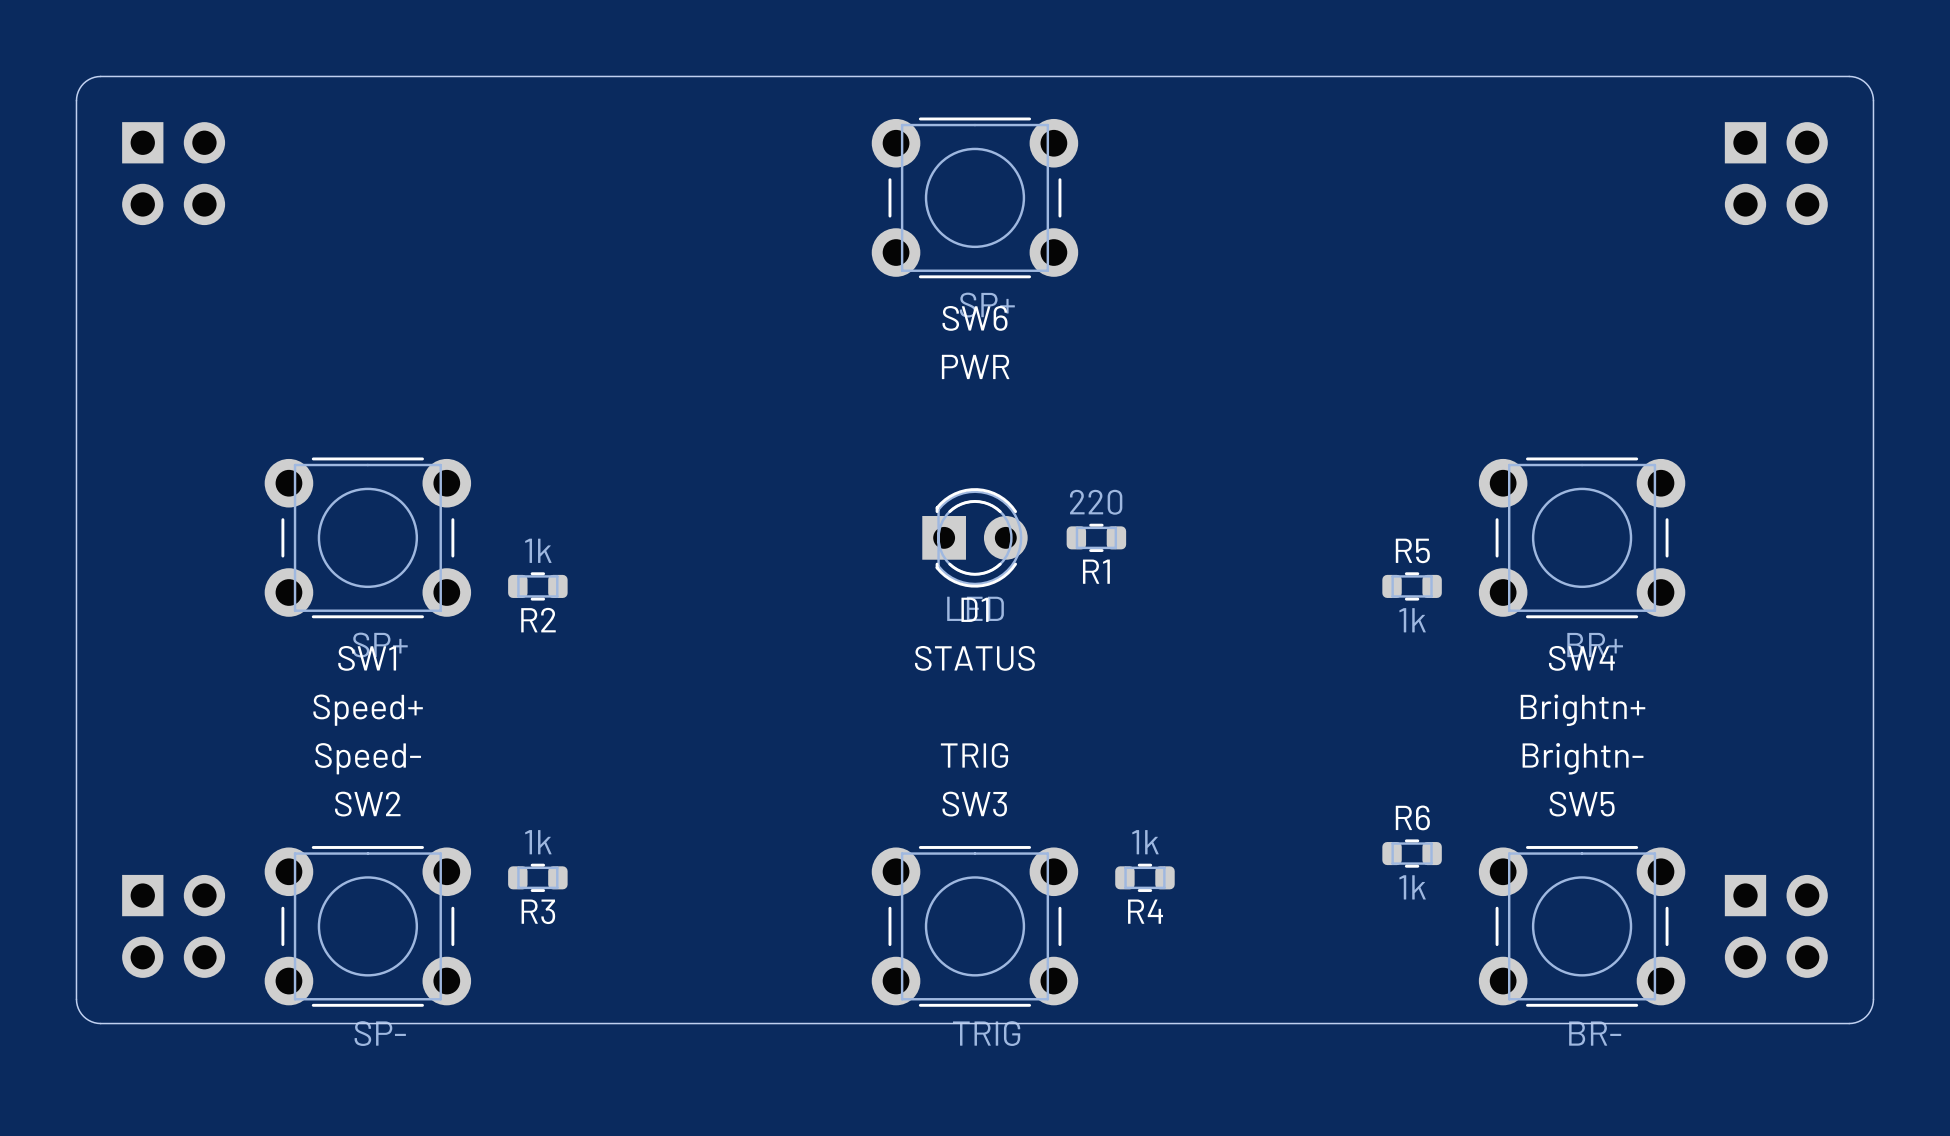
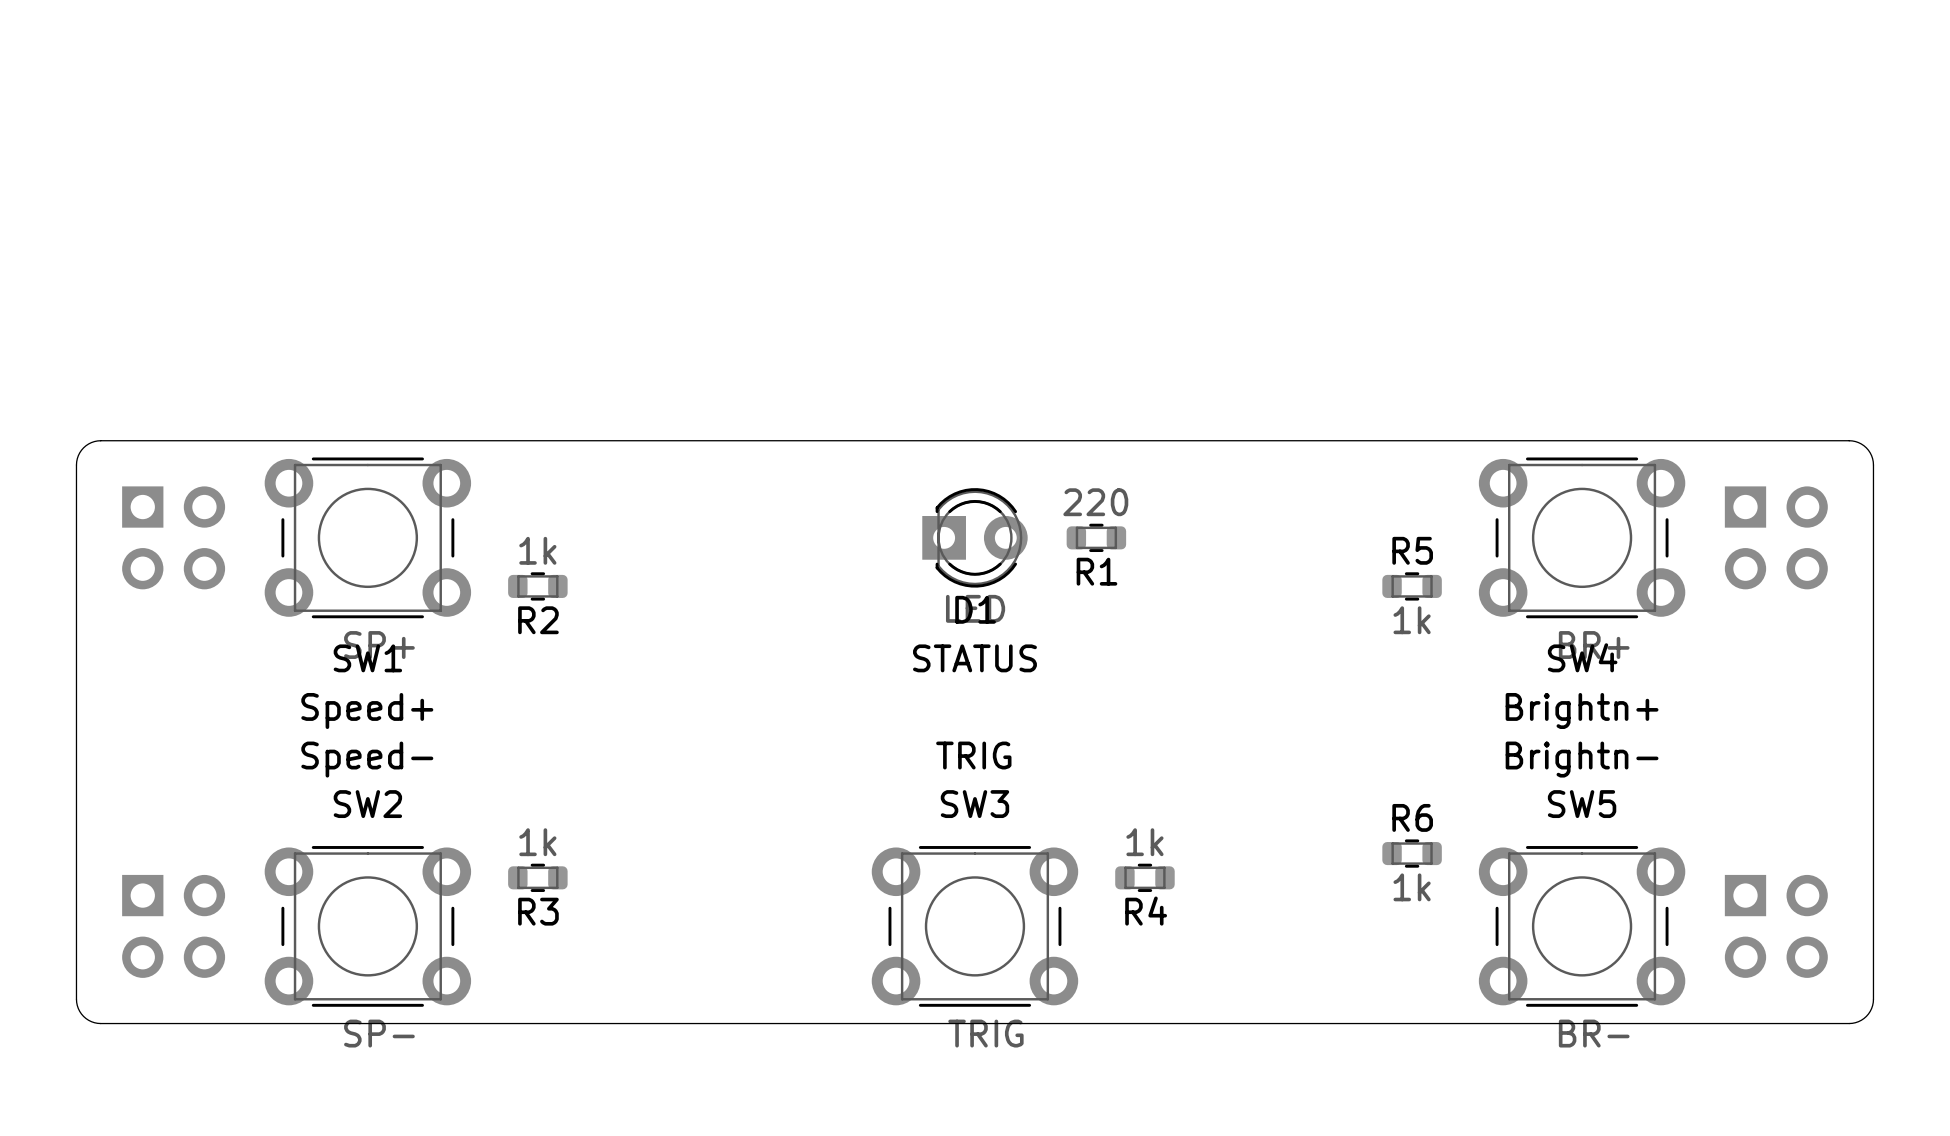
part position: (173, 173) -> (173, 537)
part position: (1776, 173) -> (1776, 537)
SW6: SP+ (974, 197) -> none
text: PWR (975, 366) -> none
board edge: (76, 465) (76, 100) (78, 91) (83, 83) (91, 78) (100, 76) (1855, 77) (1868, 85) (1873, 100) (1873, 465) -> (76, 465) (78, 455) (83, 447) (91, 442) (100, 440) (1849, 440) (1858, 442) (1866, 447) (1871, 455) (1873, 465)

